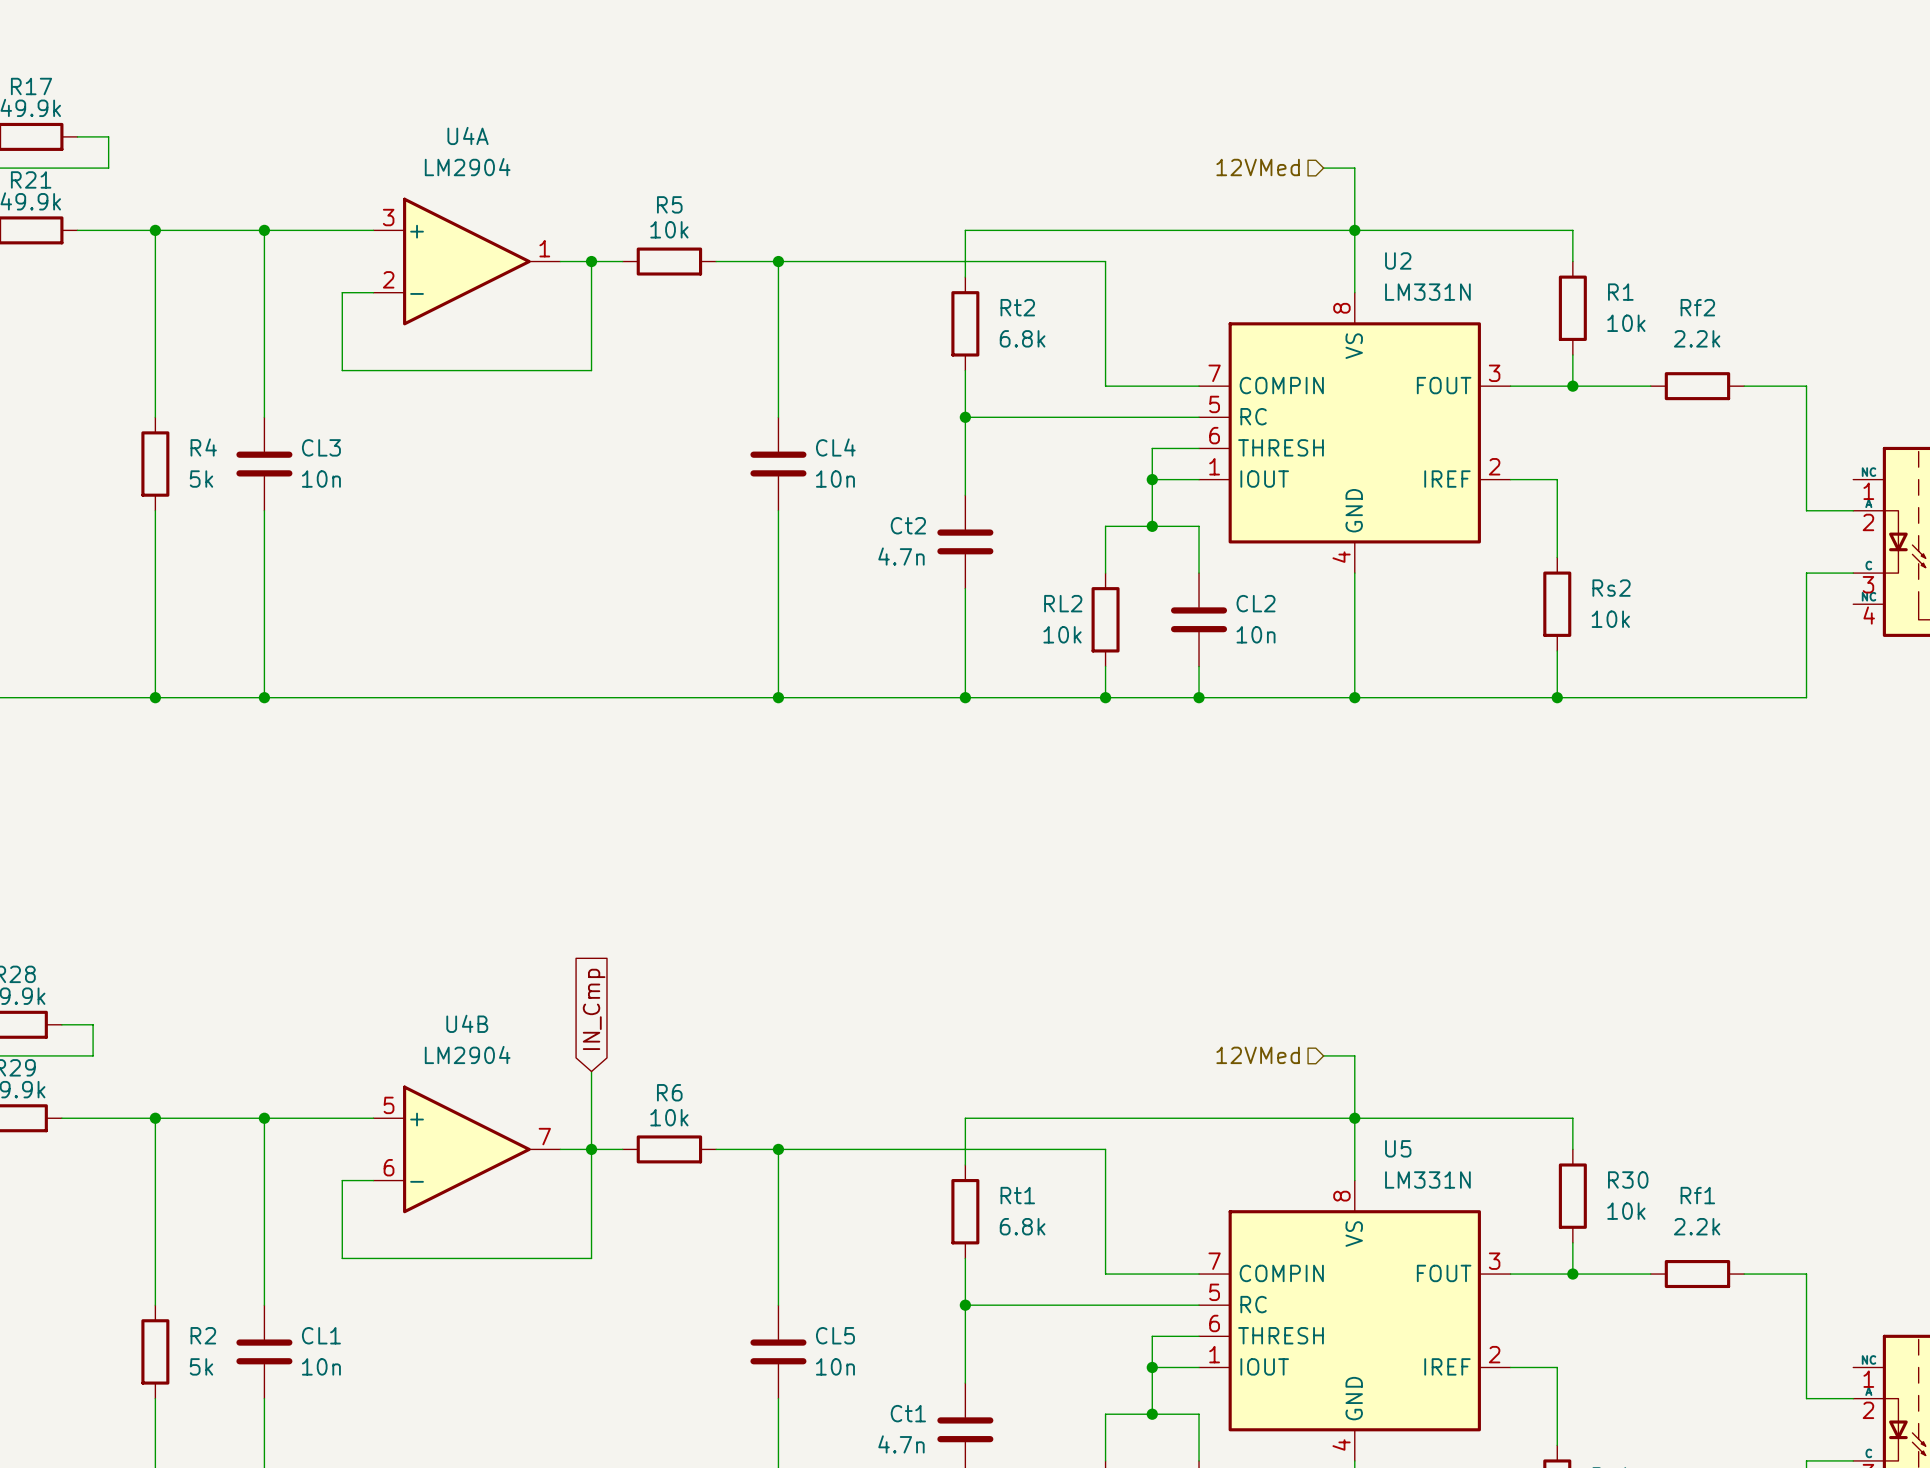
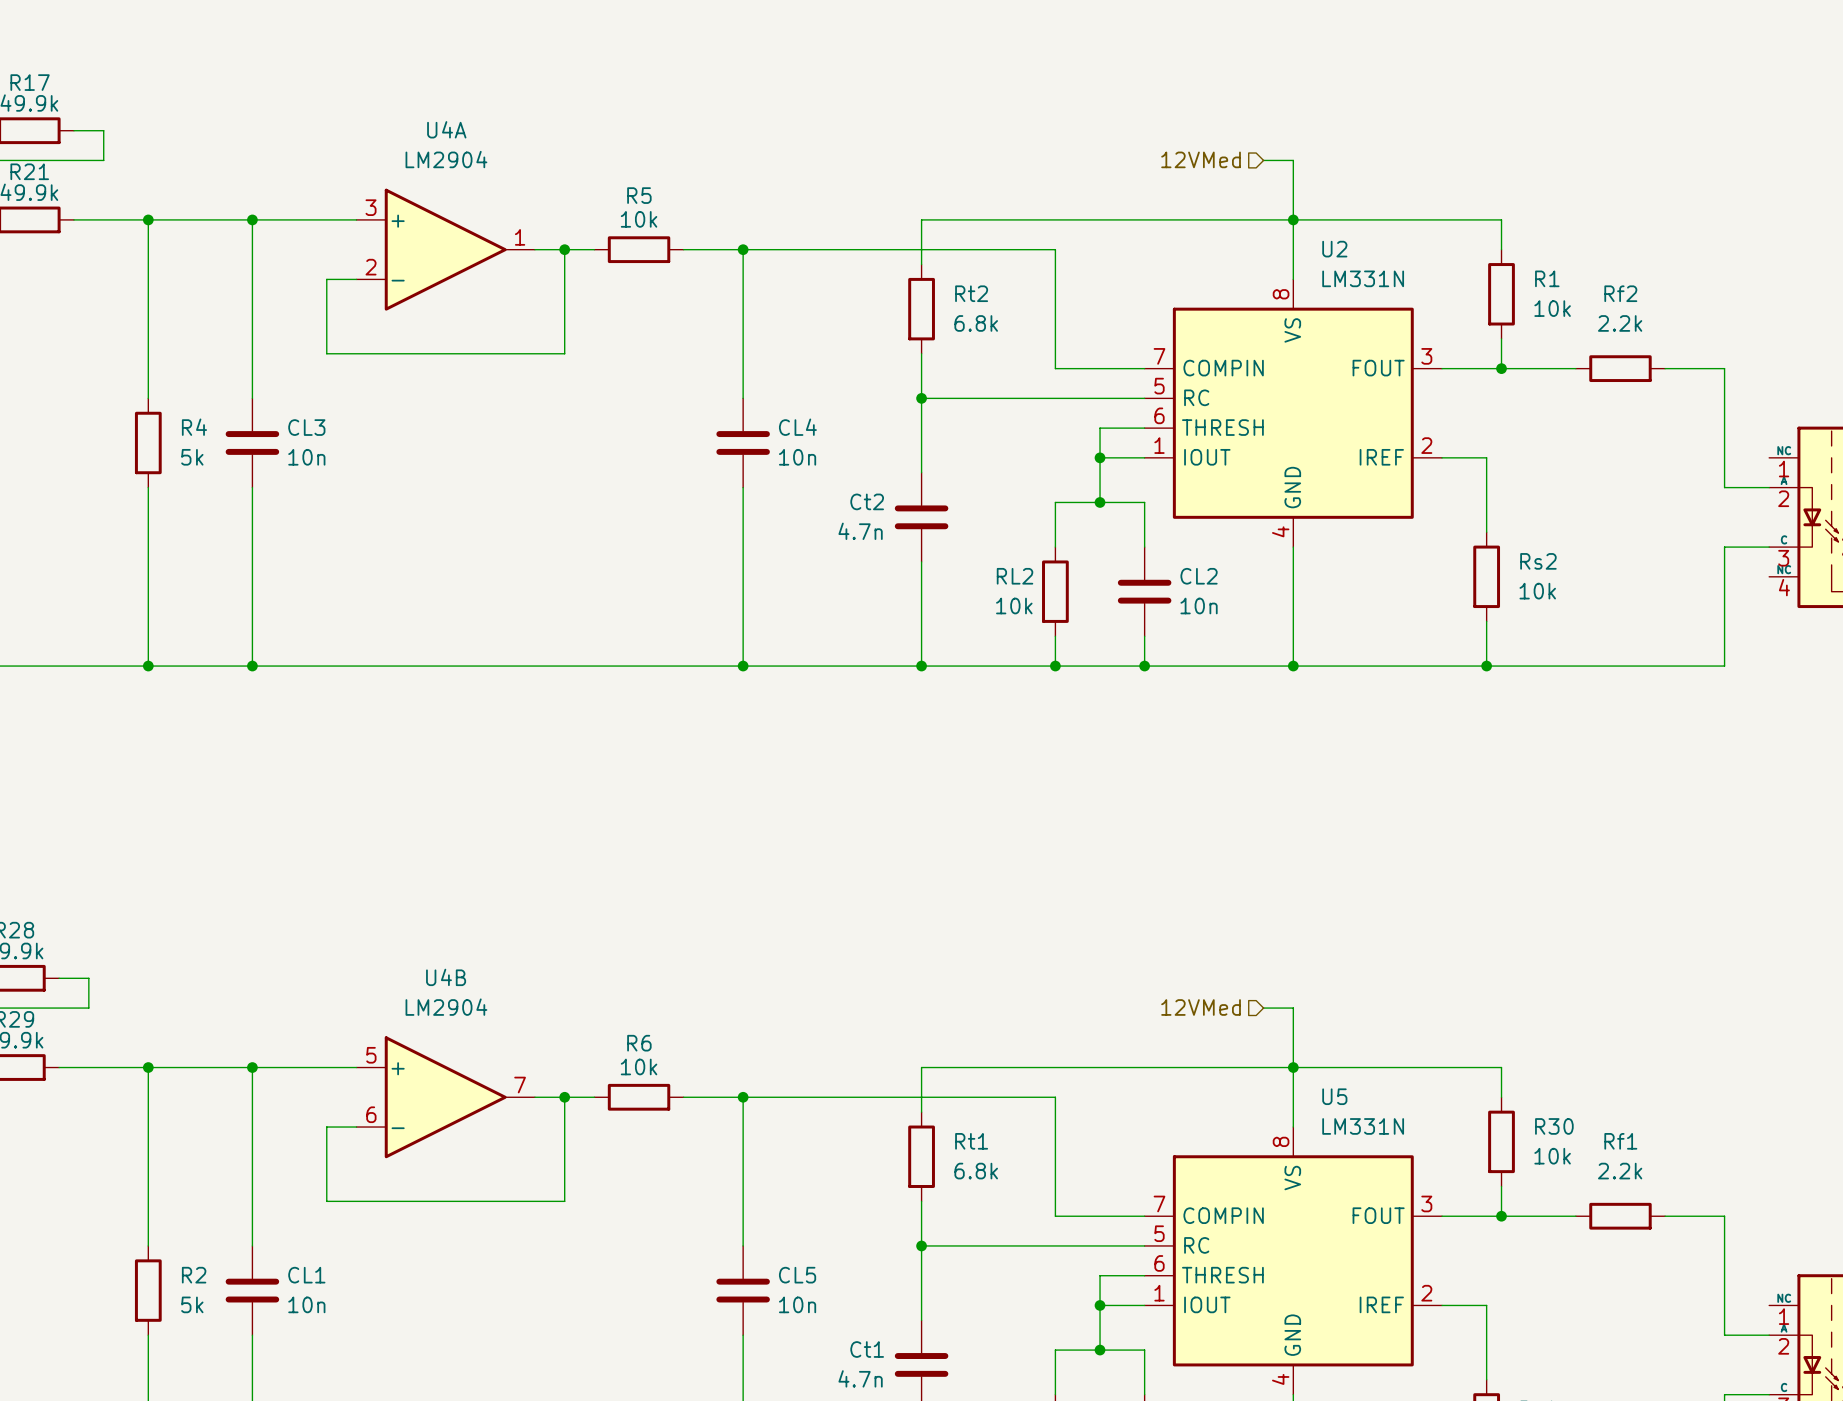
global label: IN_Cmp (594, 1009) -> none
wire: (591, 1071) (591, 1149) -> none

